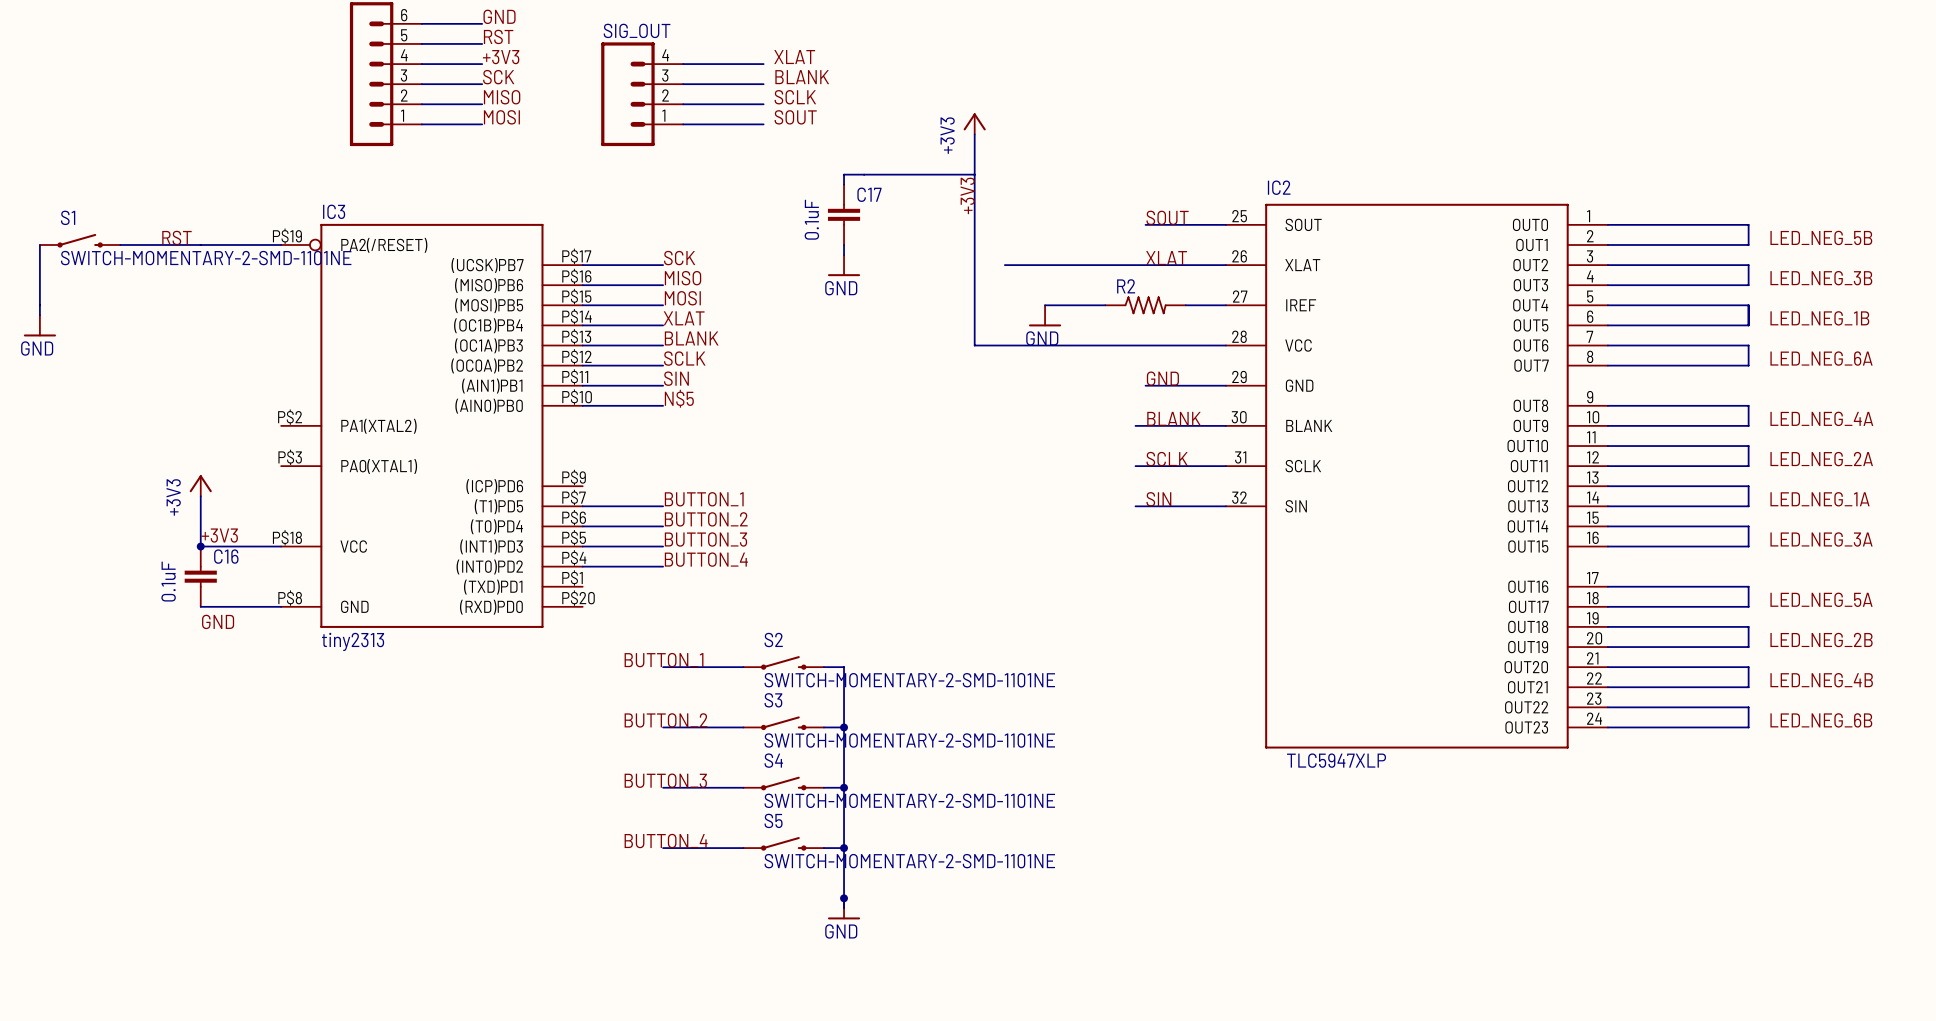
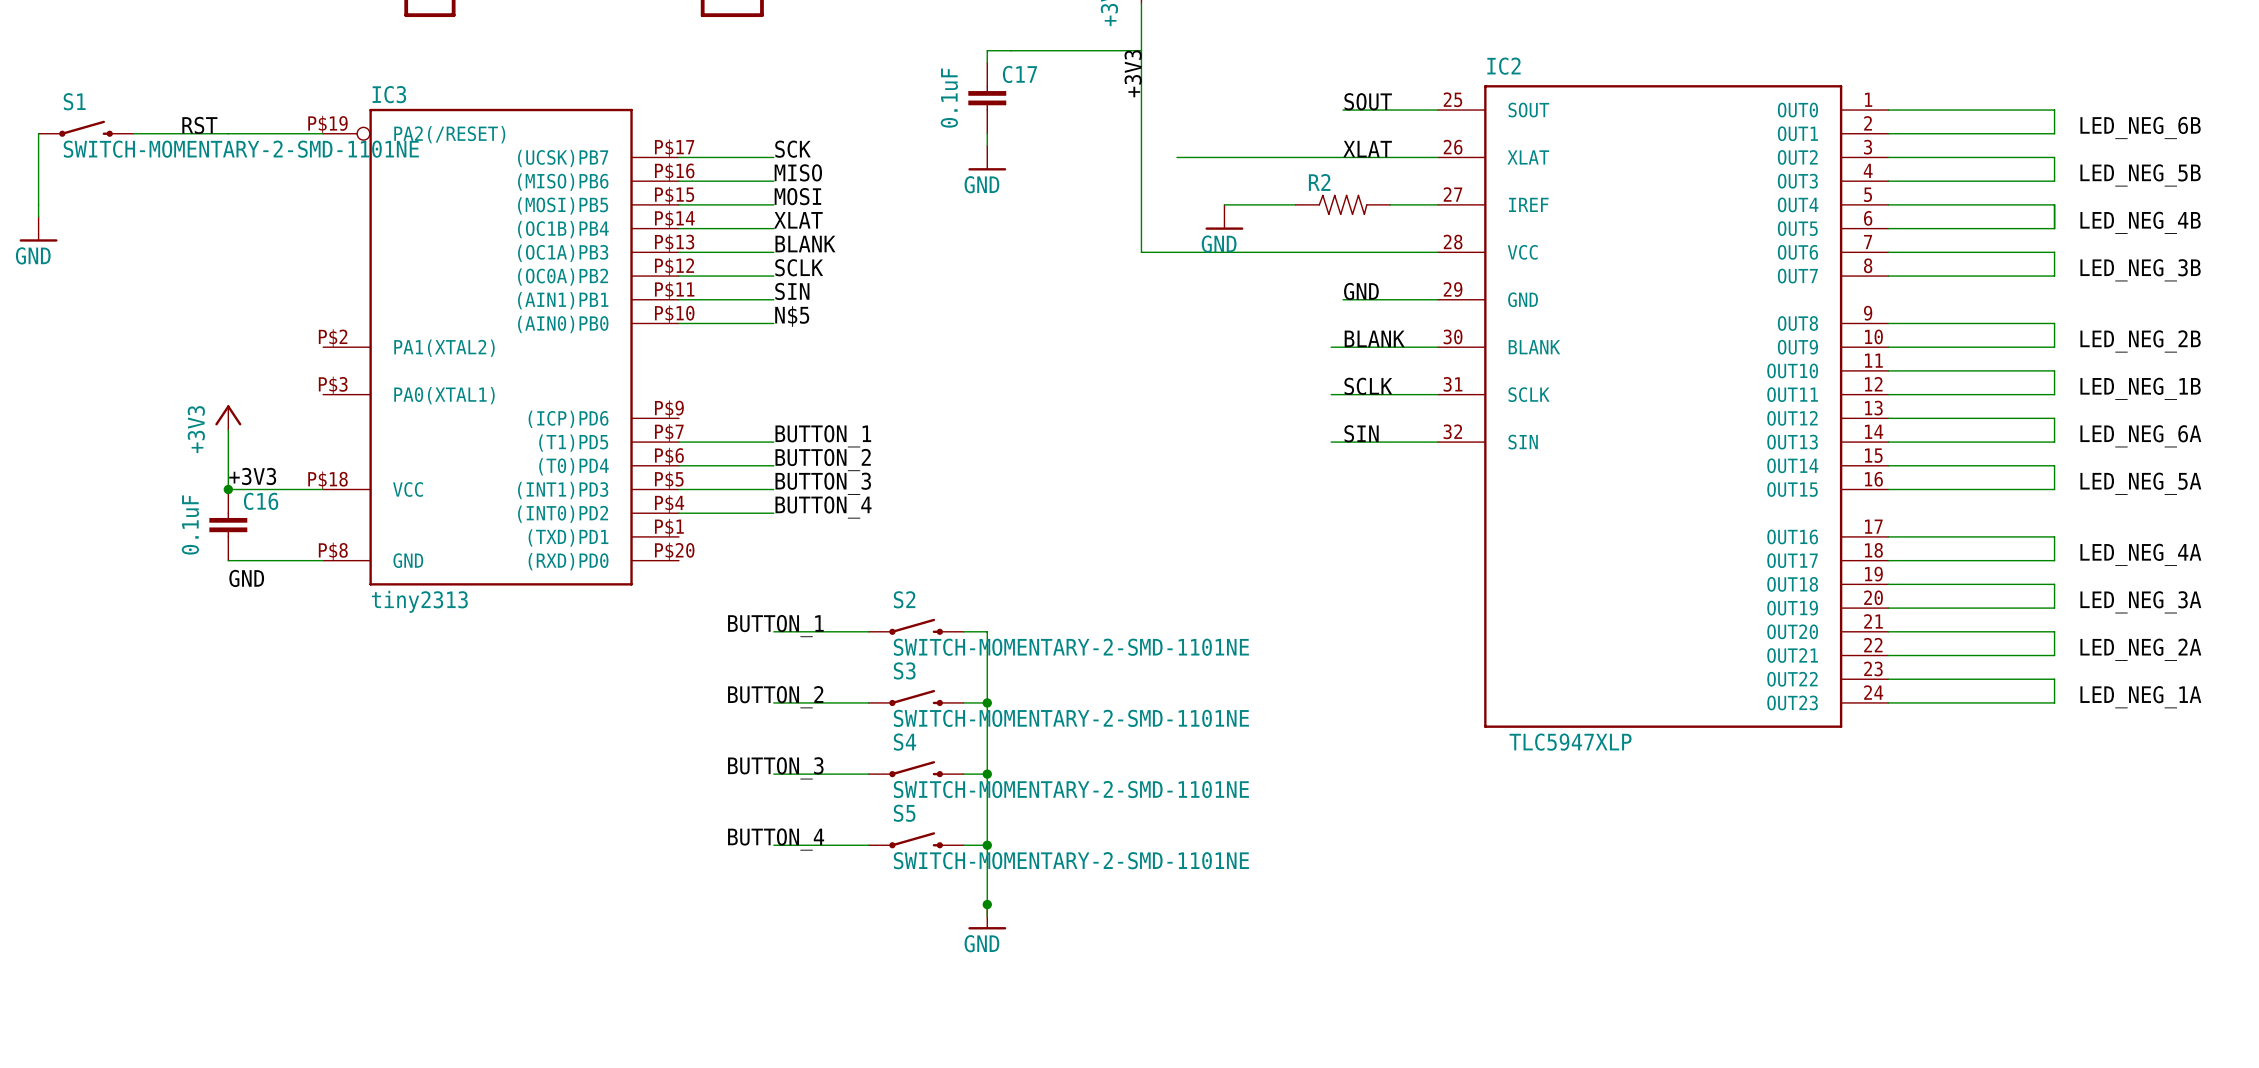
label: LED_NEG_5B (1821, 237) -> LED_NEG_6B (2140, 127)
label: LED_NEG_3B (1821, 278) -> LED_NEG_5B (2140, 175)
label: LED_NEG_1B (1819, 318) -> LED_NEG_4B (2140, 222)
label: LED_NEG_6A (1821, 358) -> LED_NEG_3B (2140, 270)
label: LED_NEG_4A (1821, 418) -> LED_NEG_2B (2140, 341)
label: LED_NEG_2A (1821, 459) -> LED_NEG_1B (2140, 388)
label: LED_NEG_1A (1820, 499) -> LED_NEG_6A (2140, 436)
label: LED_NEG_3A (1821, 539) -> LED_NEG_5A (2140, 483)
label: LED_NEG_5A (1821, 599) -> LED_NEG_4A (2140, 554)
label: LED_NEG_2B (1821, 640) -> LED_NEG_3A (2140, 602)
label: LED_NEG_4B (1821, 680) -> LED_NEG_2A (2140, 649)
label: LED_NEG_6B (1821, 720) -> LED_NEG_1A (2140, 697)

